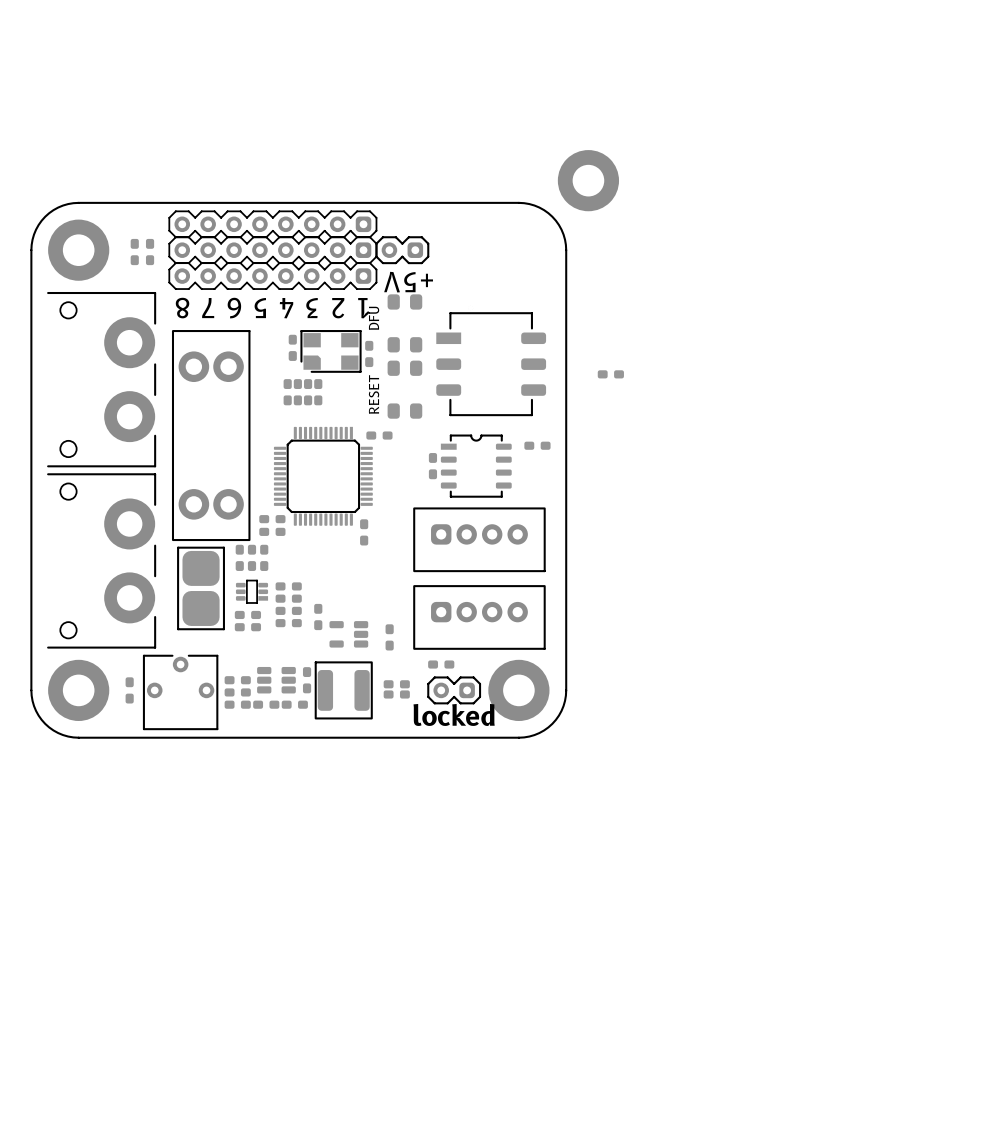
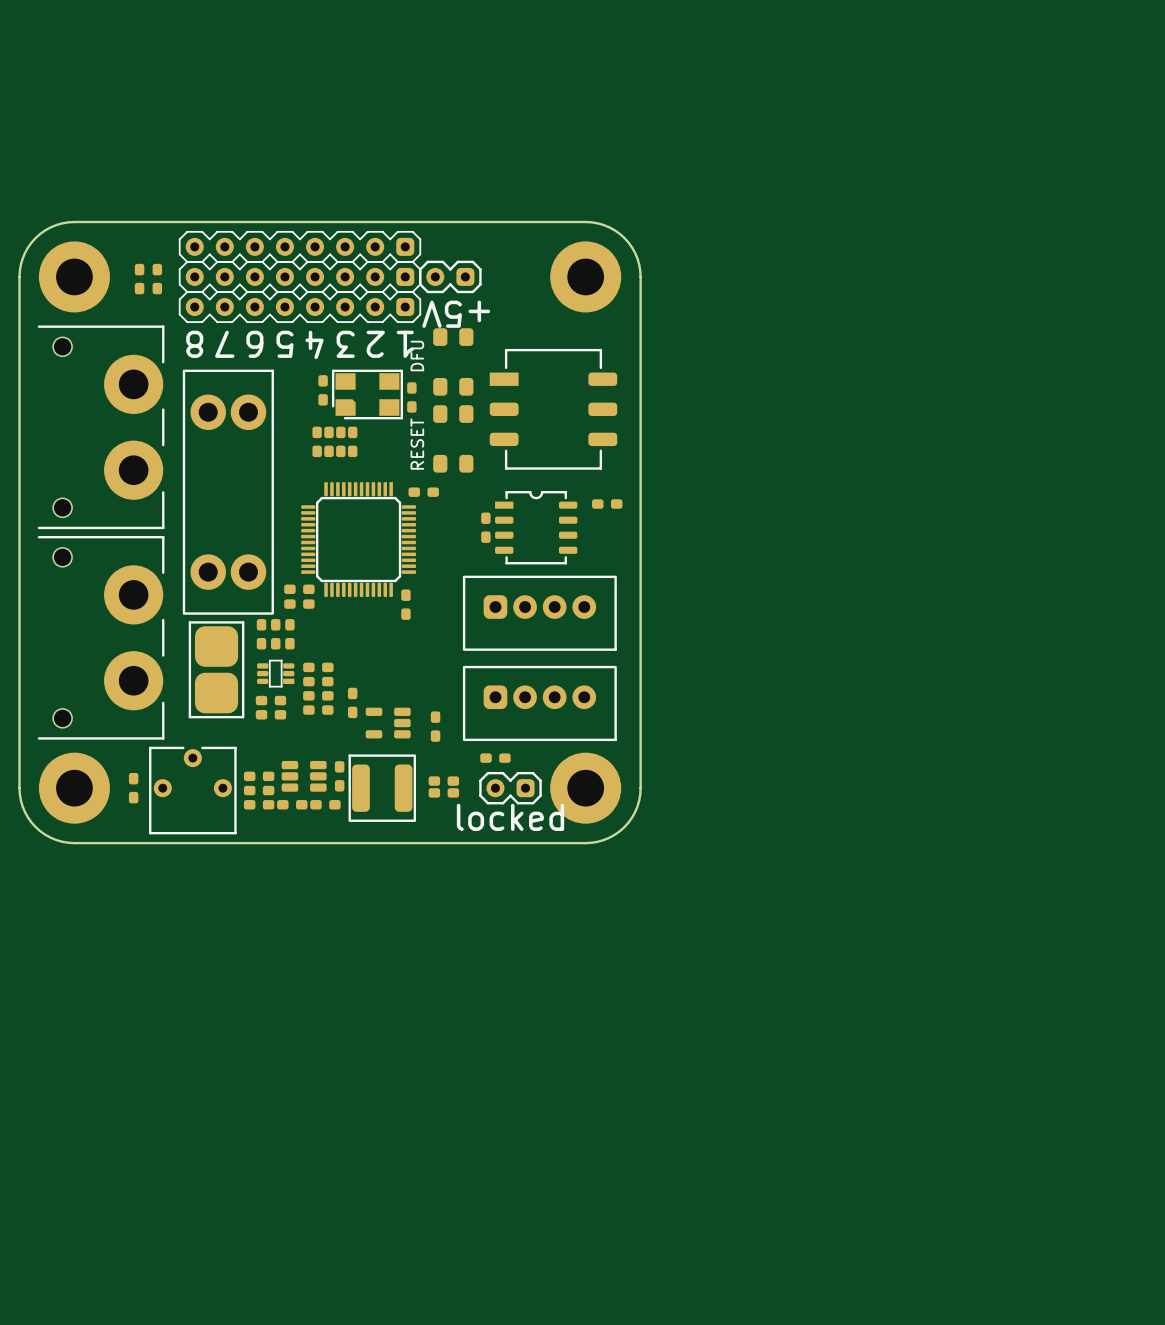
part position: (588, 180) -> (585, 276)
part: (610, 374) -> none

